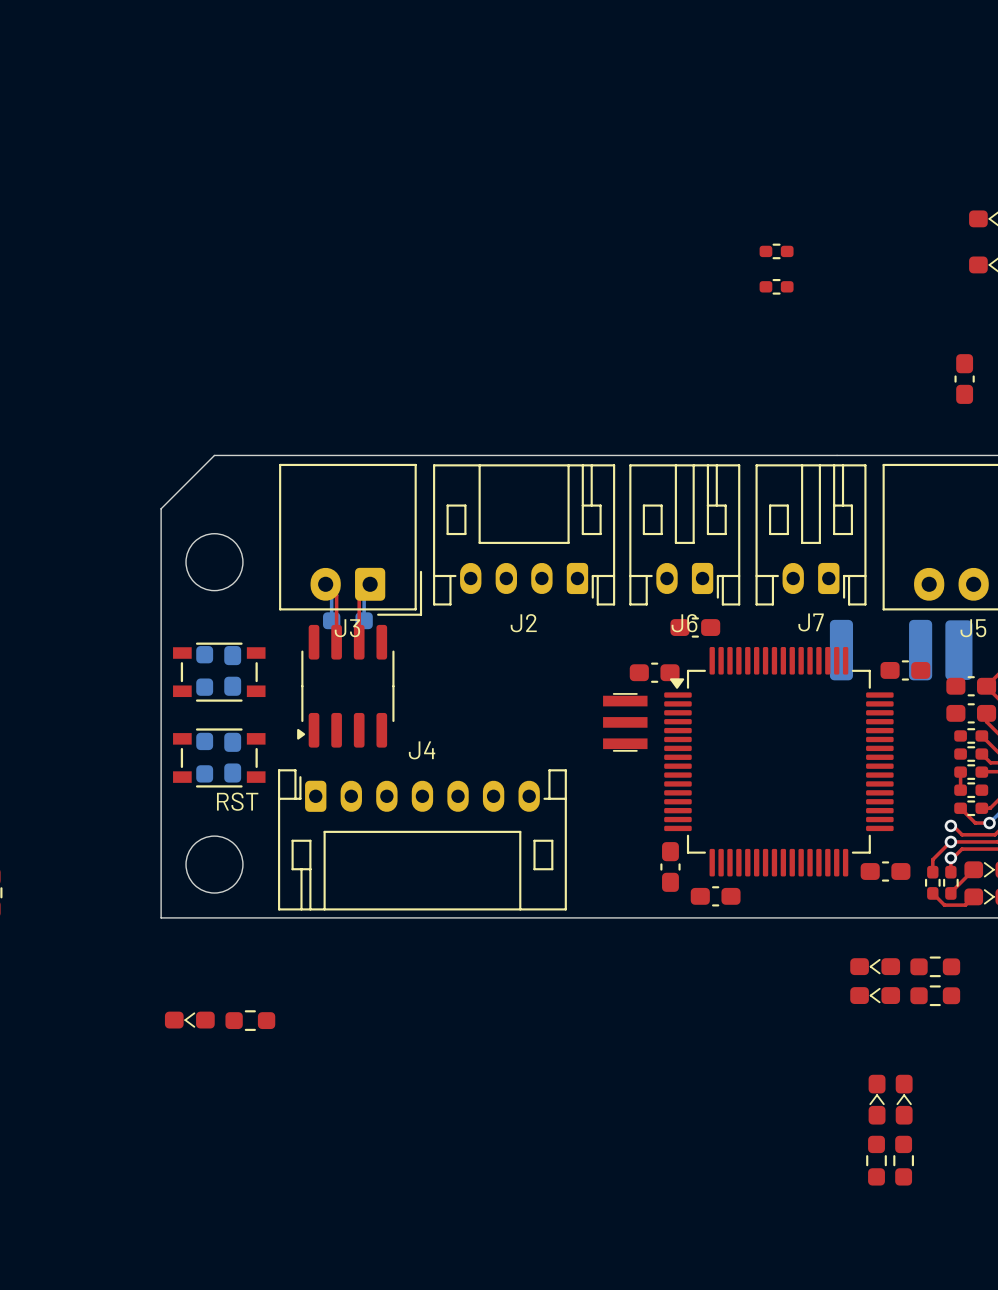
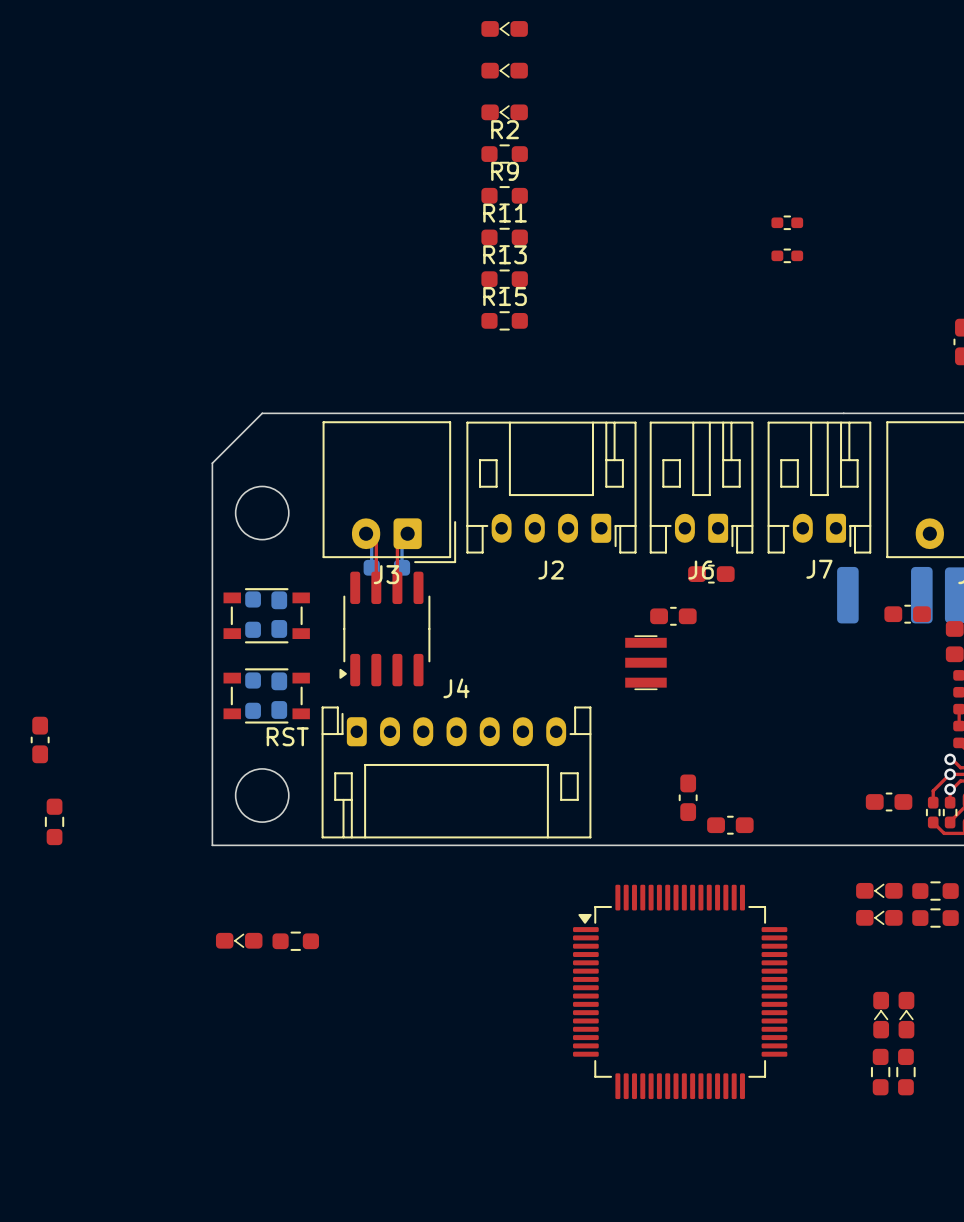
part: none -> (504, 28)
part: none -> (504, 70)
part: none -> (504, 112)
R2: none -> (504, 154)
R9: none -> (504, 195)
R11: none -> (504, 237)
R13: none -> (504, 279)
R15: none -> (504, 320)
part position: (778, 761) -> (680, 991)

